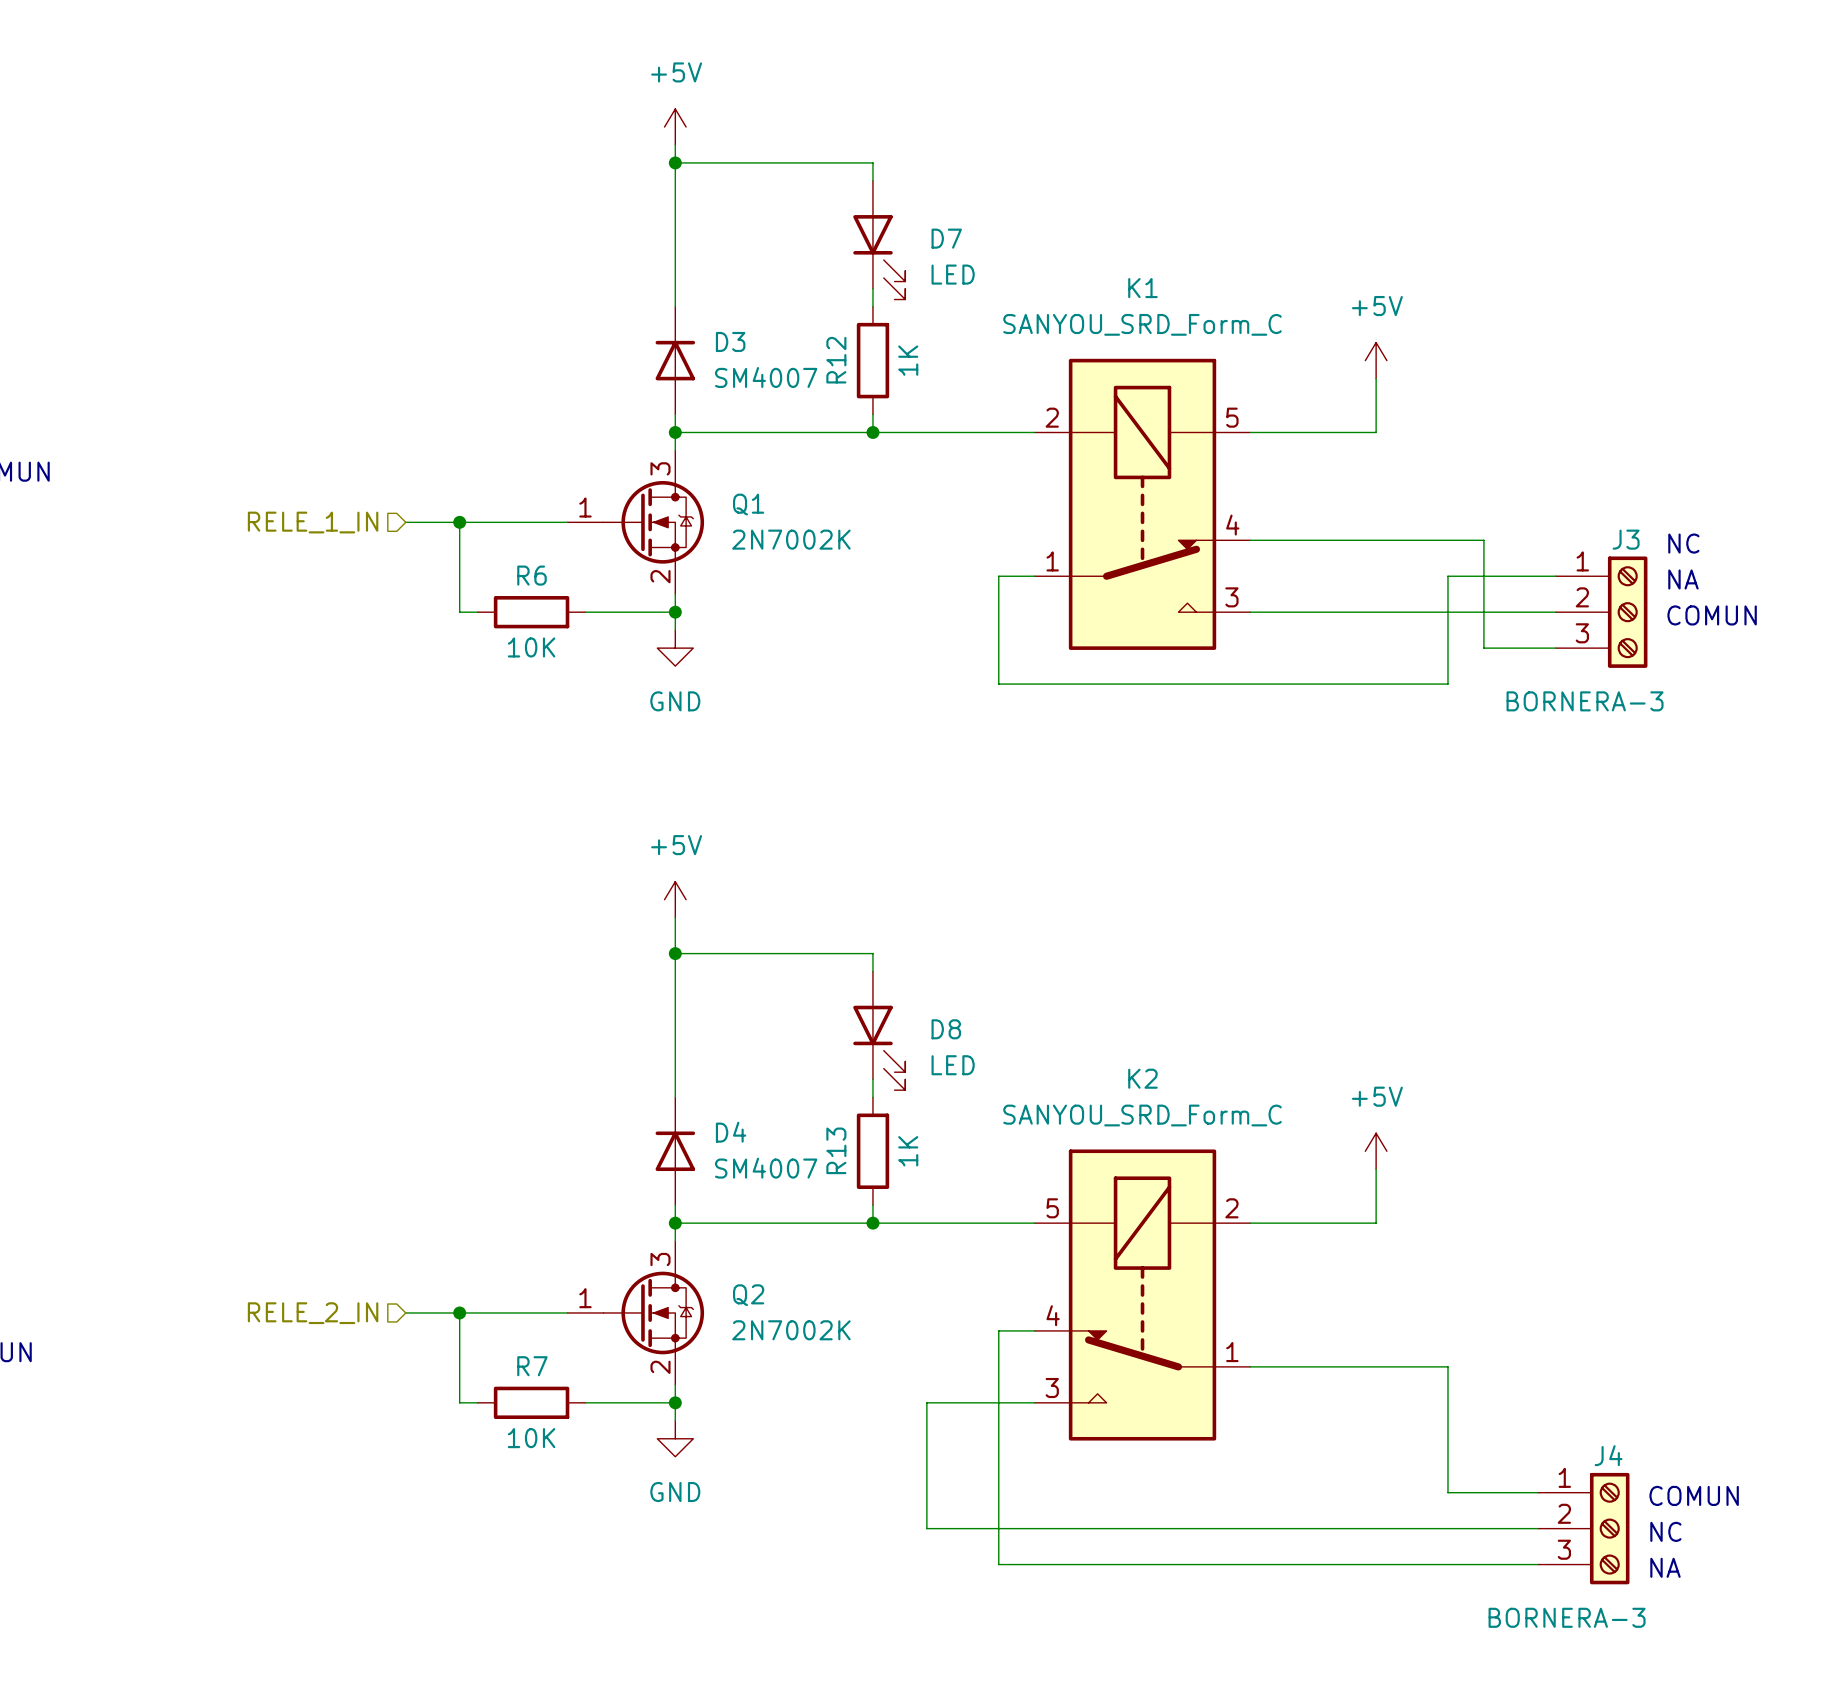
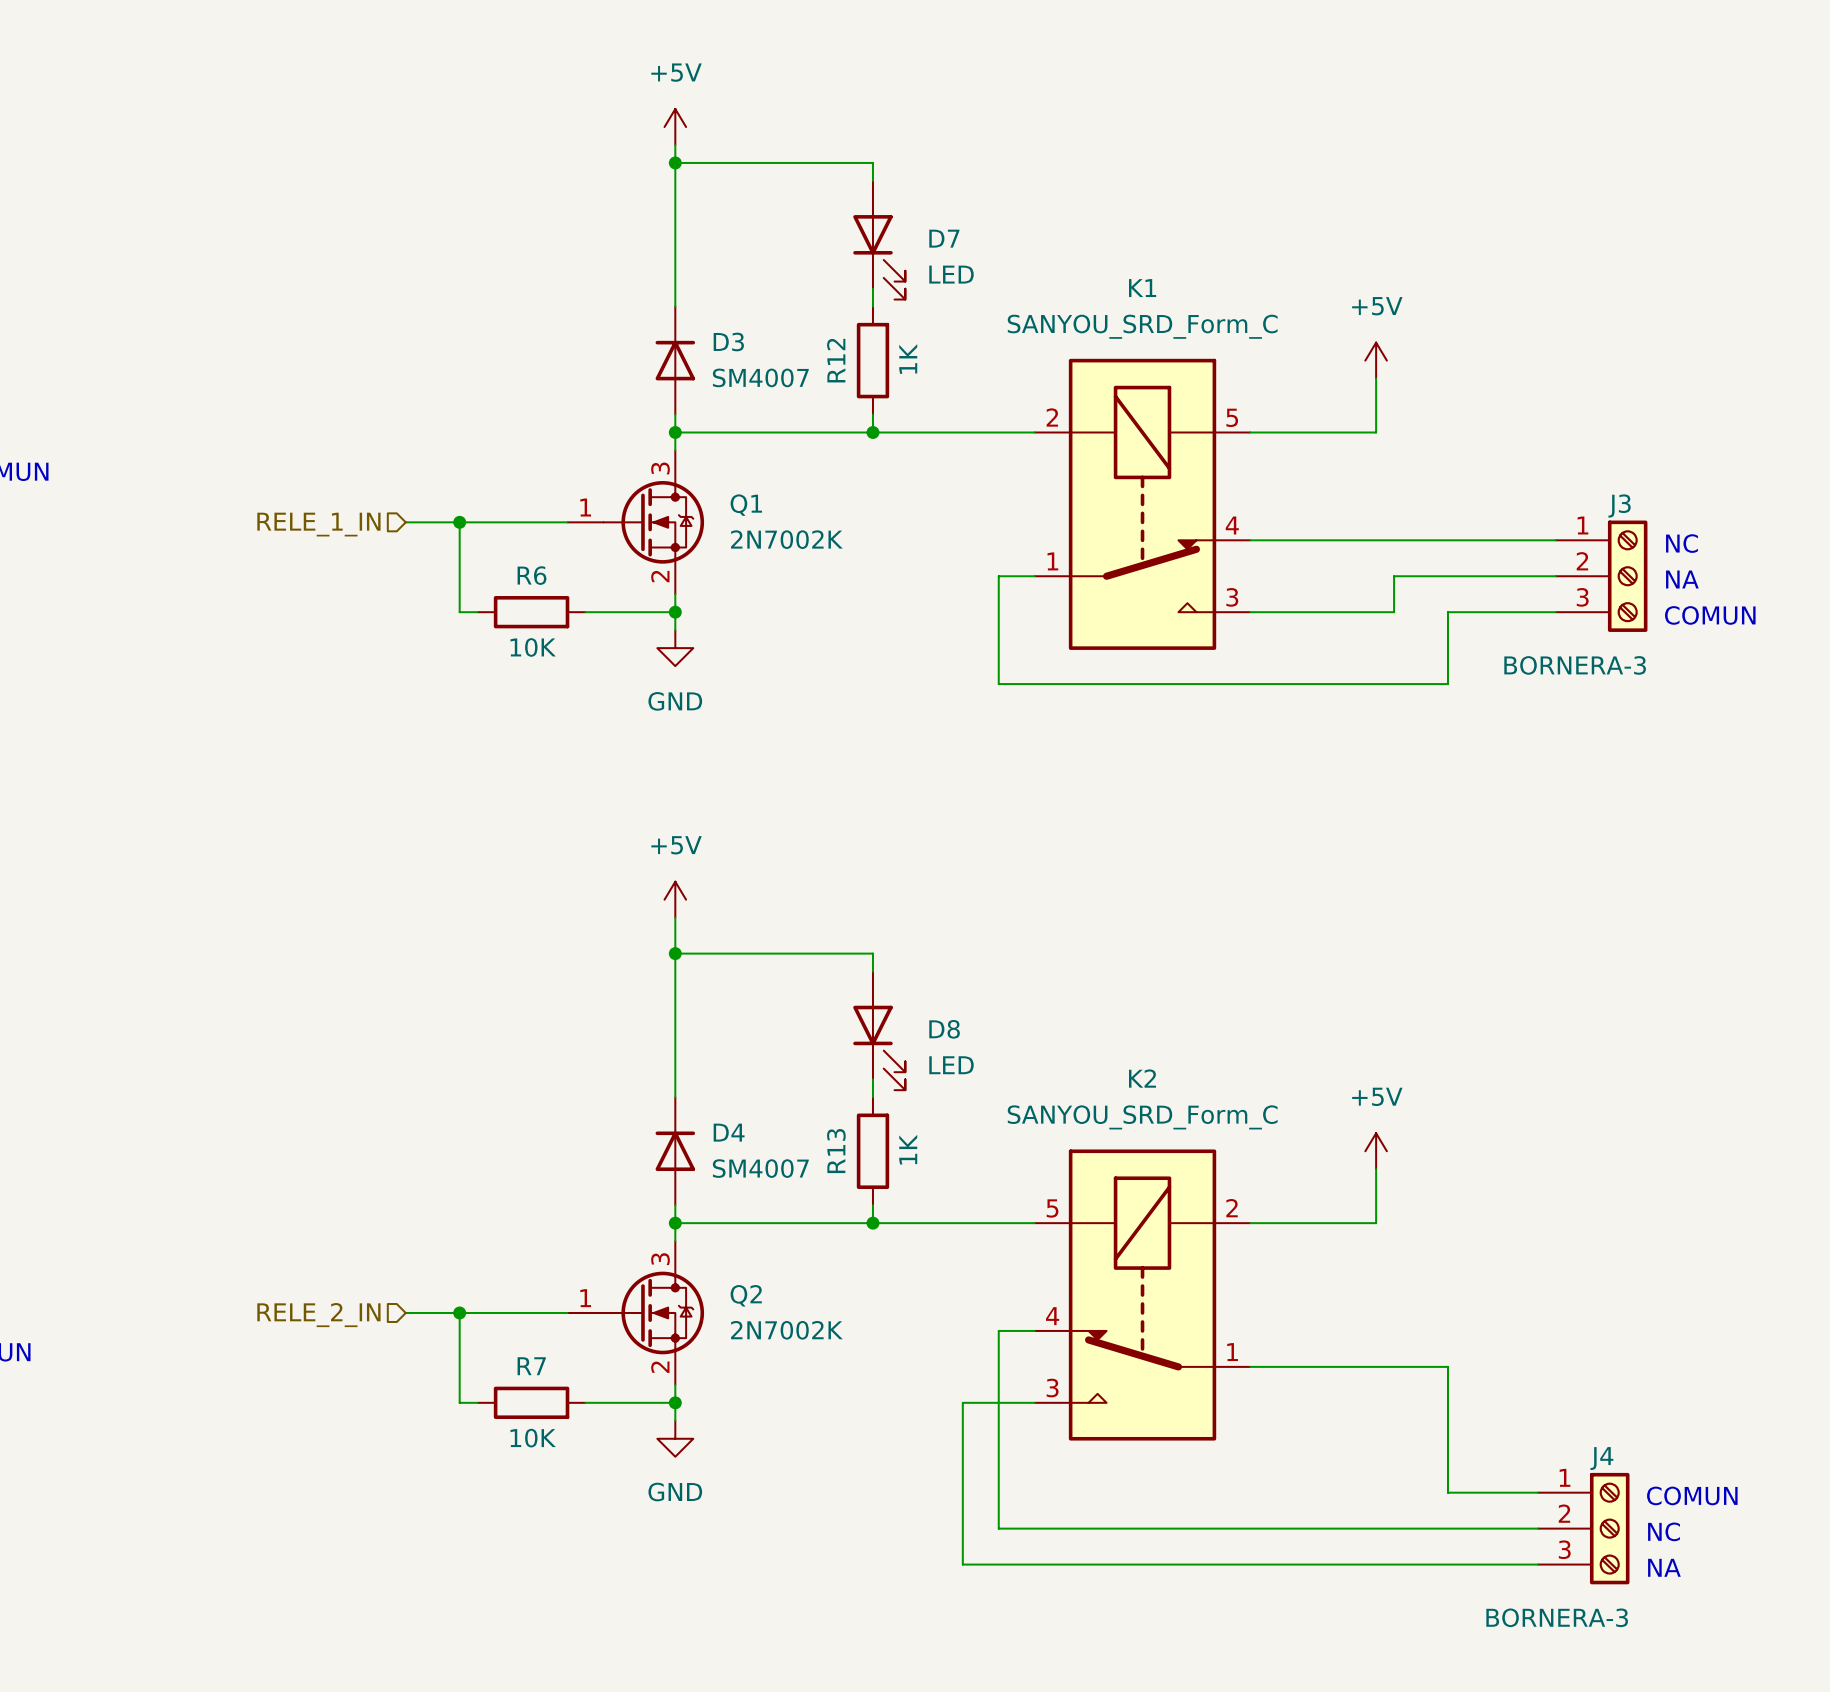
wire: (1483, 540) (1483, 648) (1555, 648) -> (1483, 540) (1555, 540)
wire: (1447, 576) (1447, 612) (1394, 612) -> (1447, 576) (1394, 576) (1394, 612)
J3 position: (1601, 612) -> (1601, 576)
wire: (962, 1402) (926, 1402) (926, 1528) (998, 1528) (998, 1564) -> (962, 1402) (962, 1564) (998, 1564)

